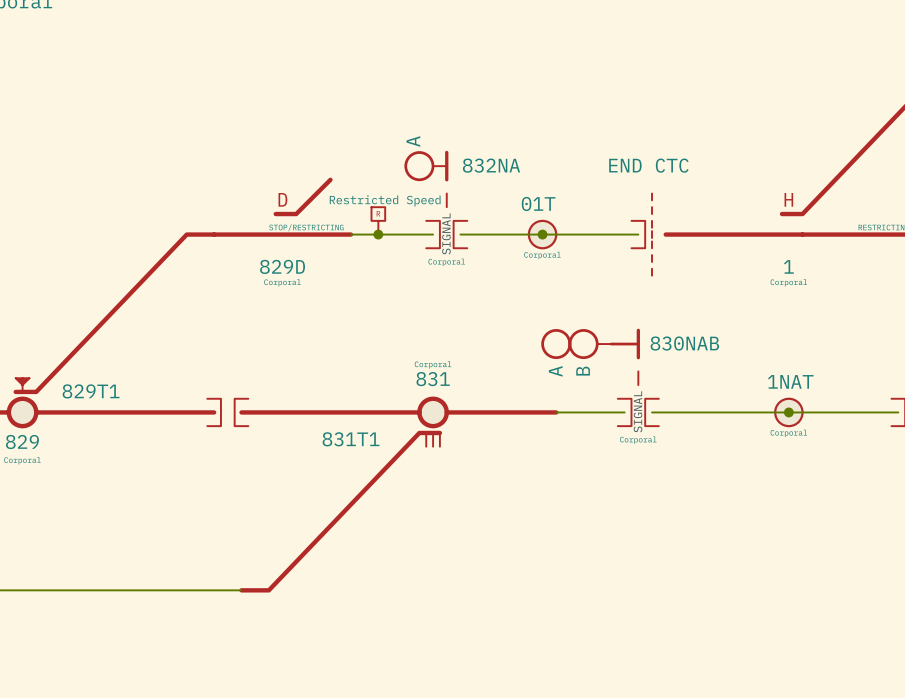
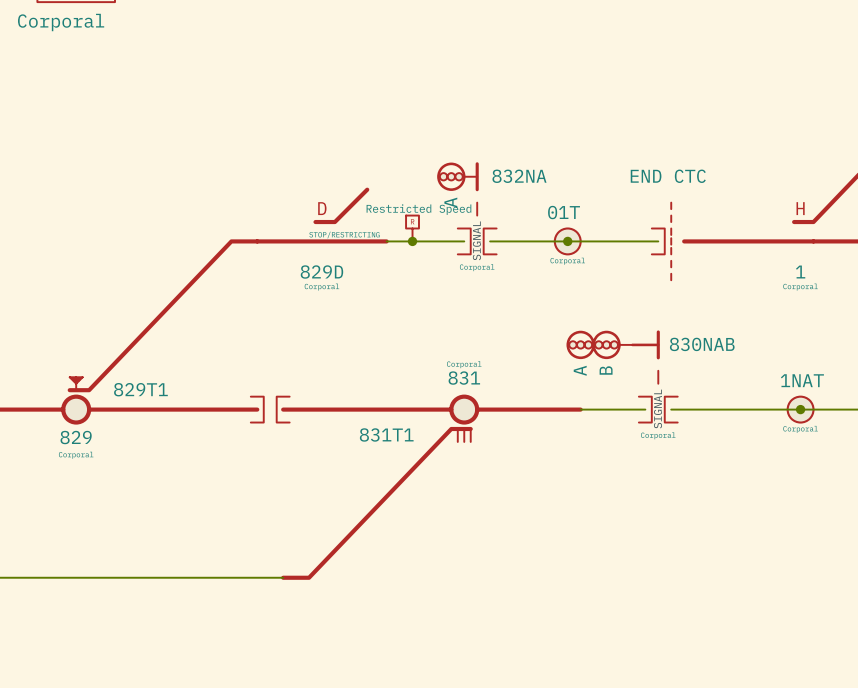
part value position: A (413, 141) -> A (450, 202)
part symbol: [404, 151, 435, 182] -> [437, 162, 466, 191]
part symbol: [541, 329, 572, 360] -> [566, 330, 595, 360]
part symbol: [568, 329, 599, 360] -> [592, 330, 621, 360]

